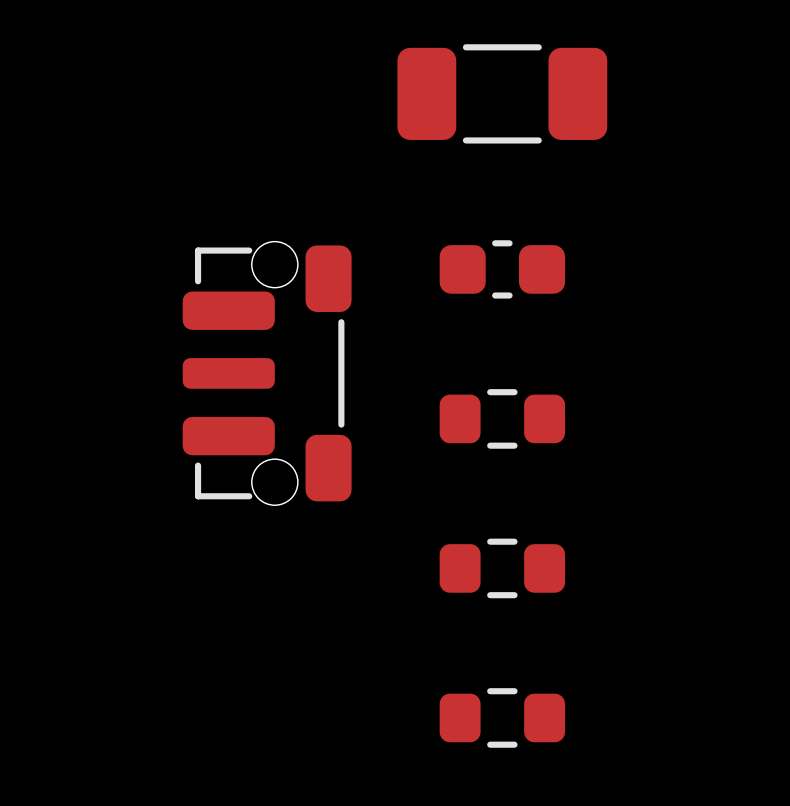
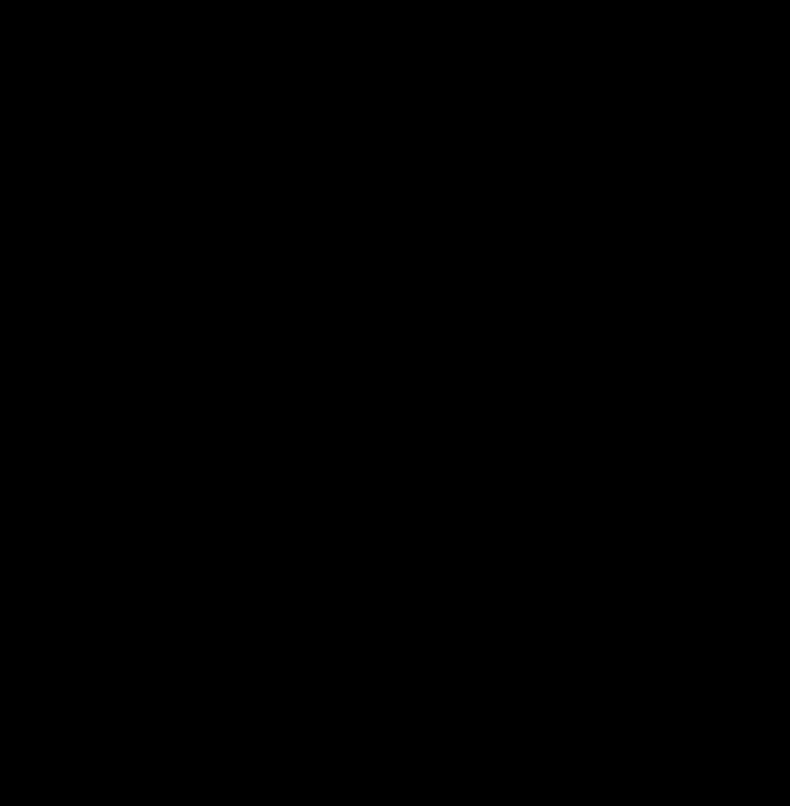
part: (502, 93) -> none
part: (502, 269) -> none
part: (267, 373) -> none
part: (502, 418) -> none
part: (502, 568) -> none
part: (502, 717) -> none

